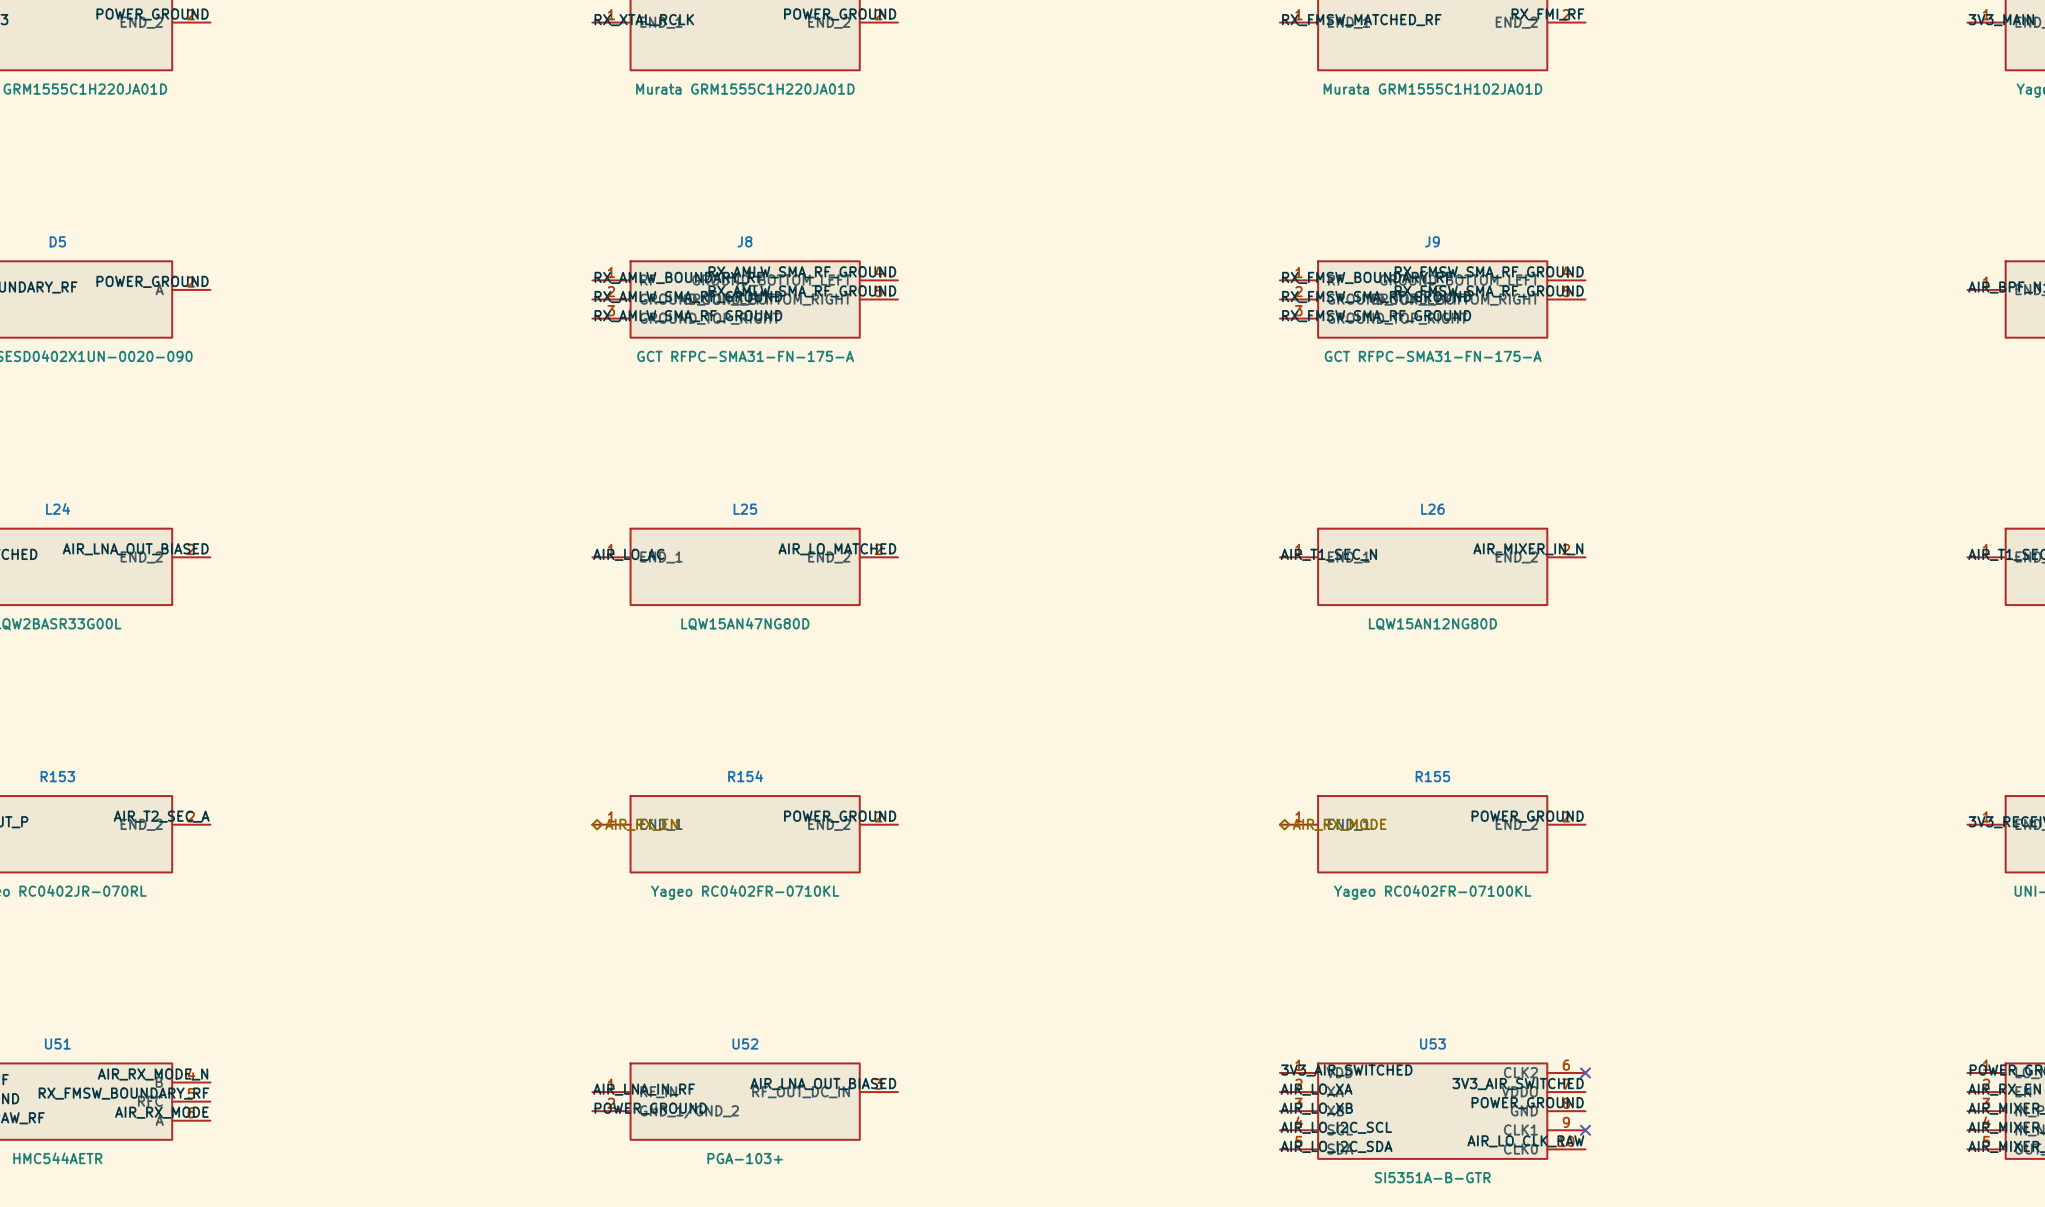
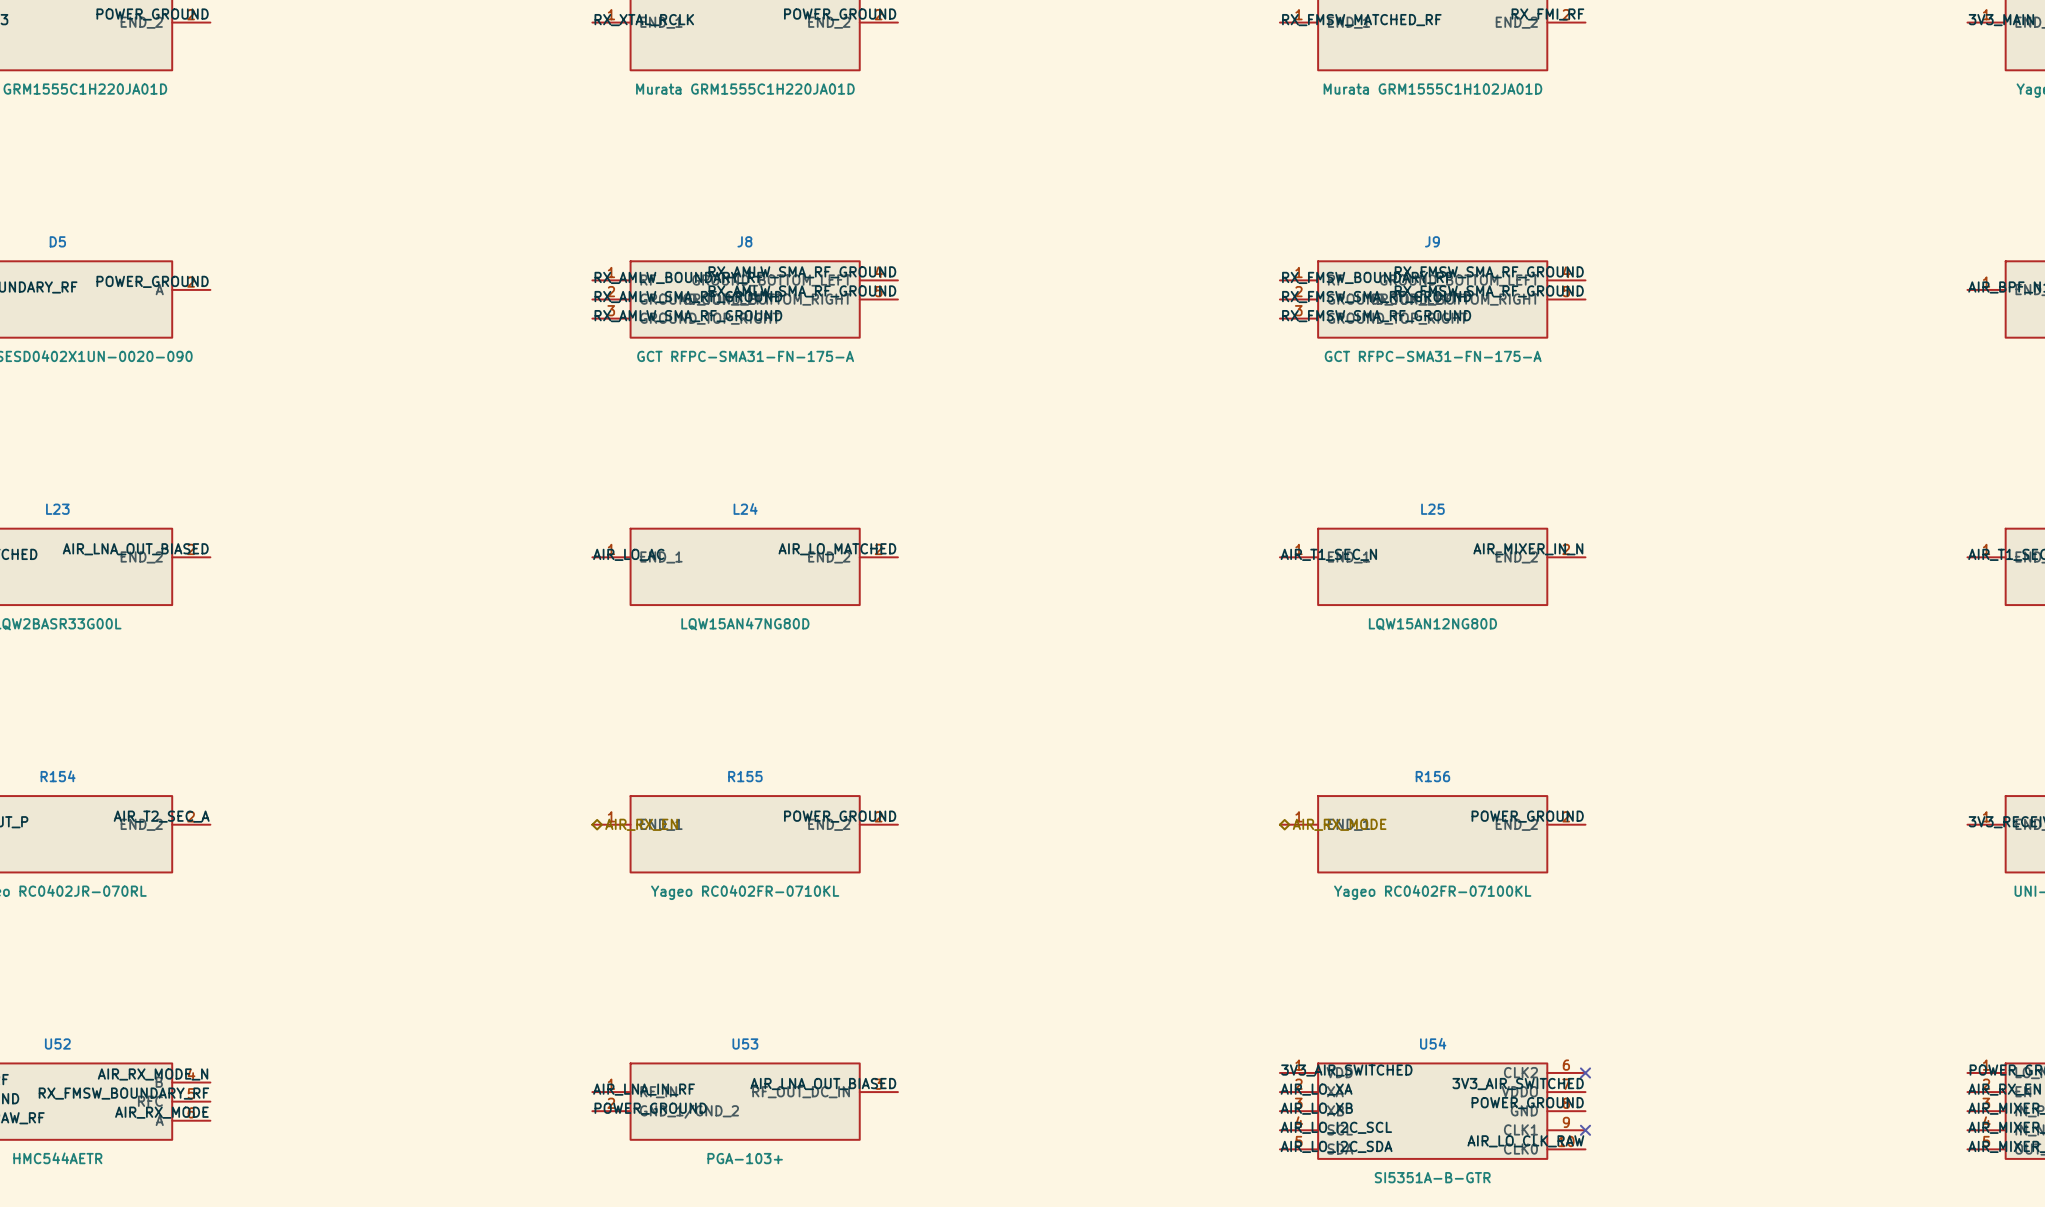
L24 name: L24 (58, 508) -> L23 (57, 509)
L25 name: L25 (745, 509) -> L24 (745, 508)
L26 name: L26 (1432, 509) -> L25 (1432, 509)
R153 name: R153 (57, 776) -> R154 (58, 776)
R154 name: R154 (745, 776) -> R155 (745, 776)
R155 name: R155 (1432, 776) -> R156 (1432, 776)
U51 name: U51 (57, 1043) -> U52 (57, 1043)
U52 name: U52 (745, 1043) -> U53 (745, 1043)
U53 name: U53 (1432, 1043) -> U54 (1433, 1043)

